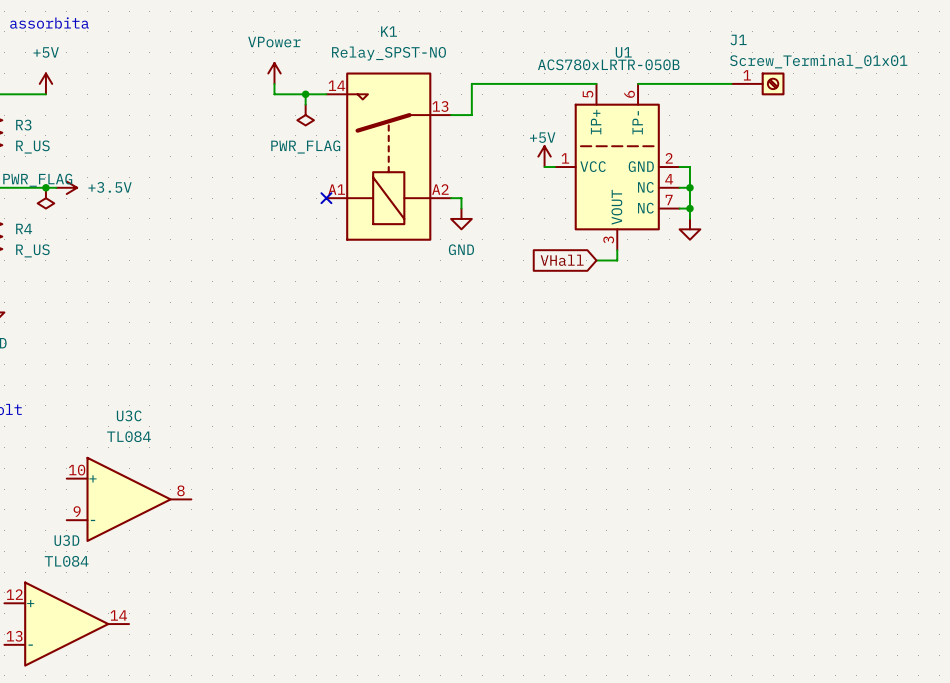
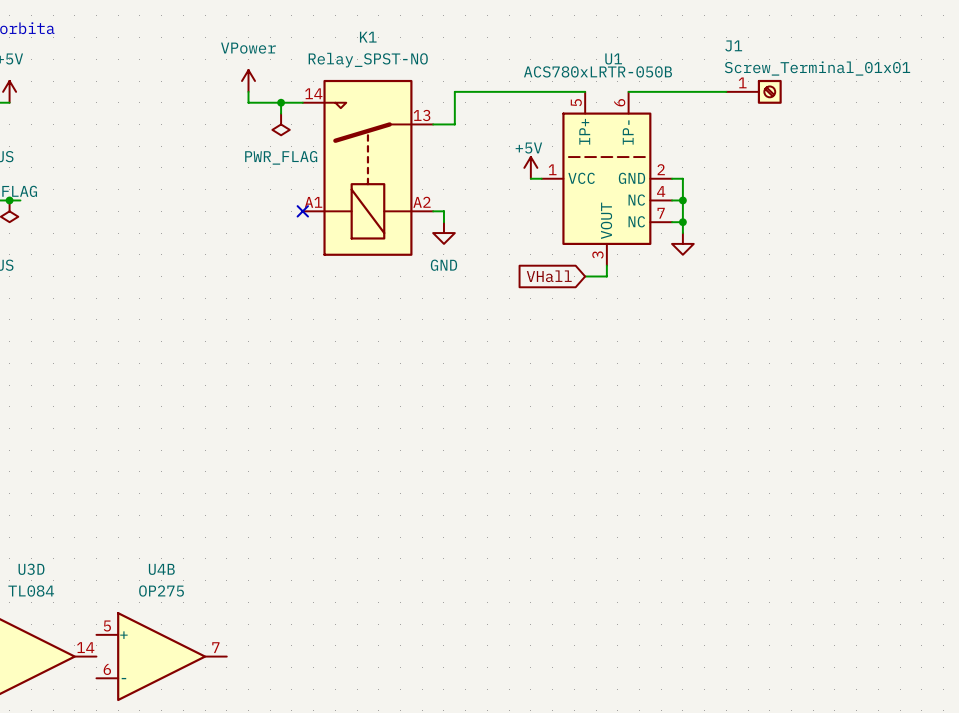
power symbol: +3.5V (66, 187) -> none
U3C: TL084 (129, 499) -> none
U4B: none -> OP275 (161, 656)

